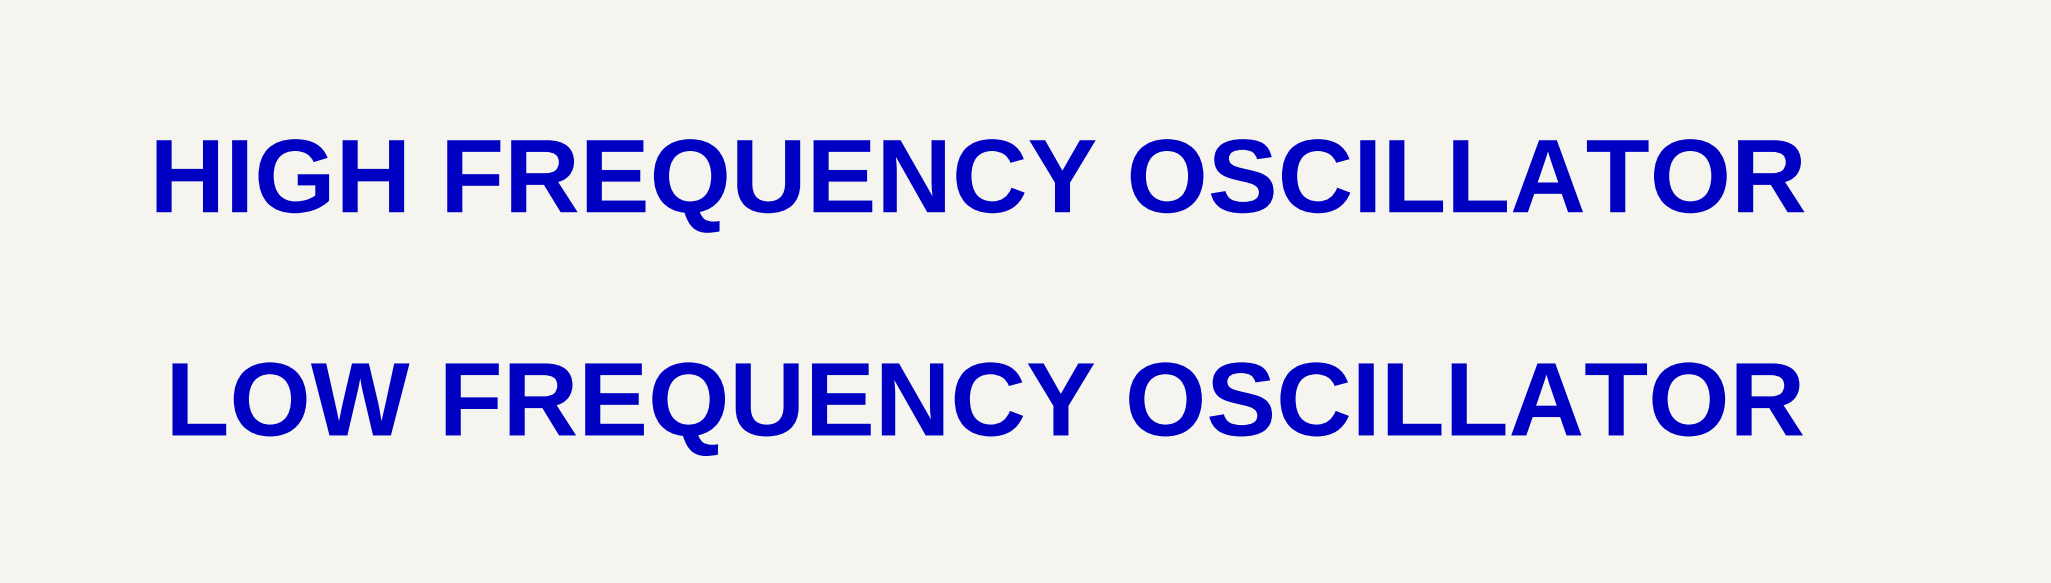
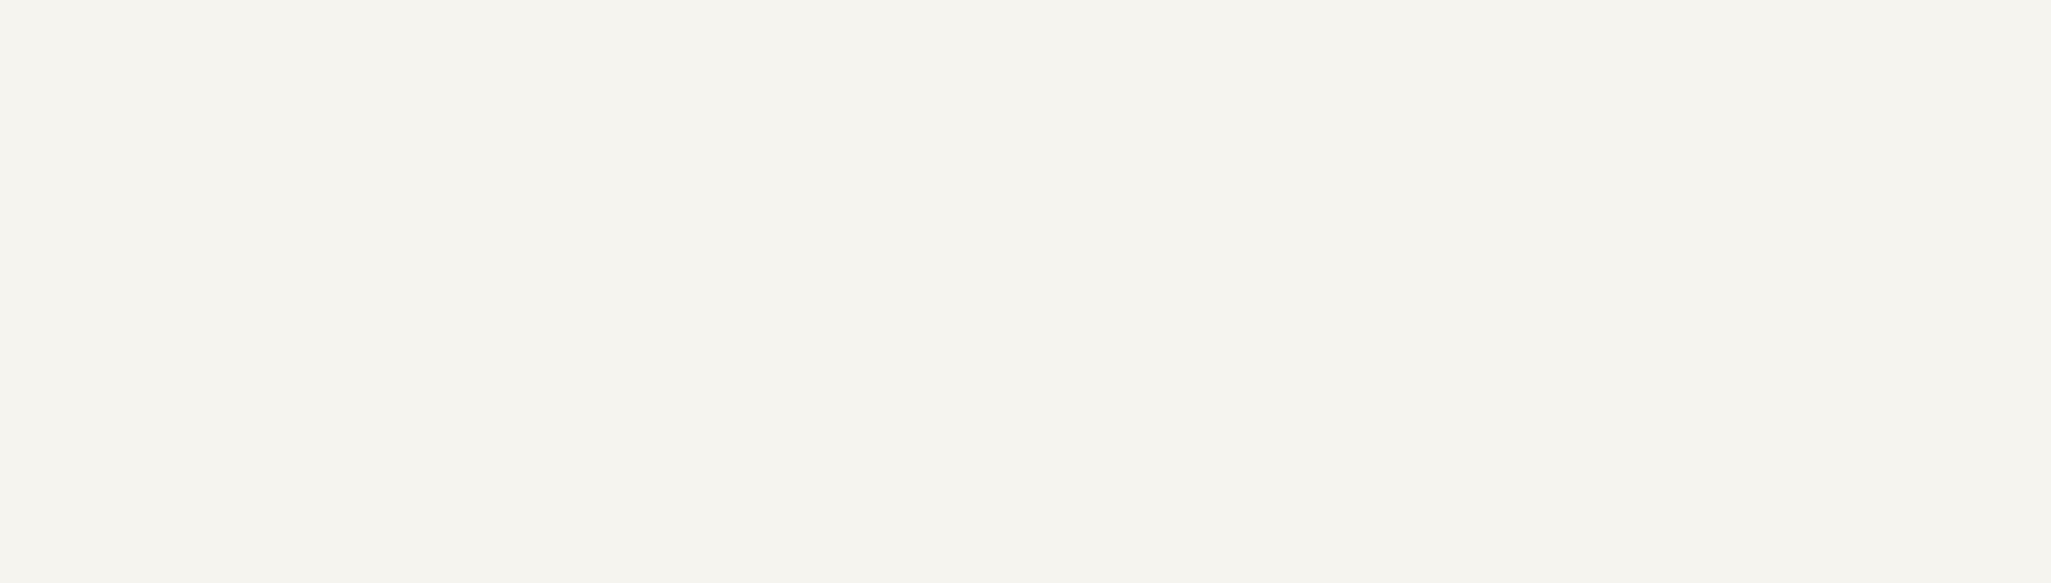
text: HIGH FREQUENCY OSCILLATOR (980, 185) -> none
text: LOW FREQUENCY OSCILLATOR (987, 409) -> none

